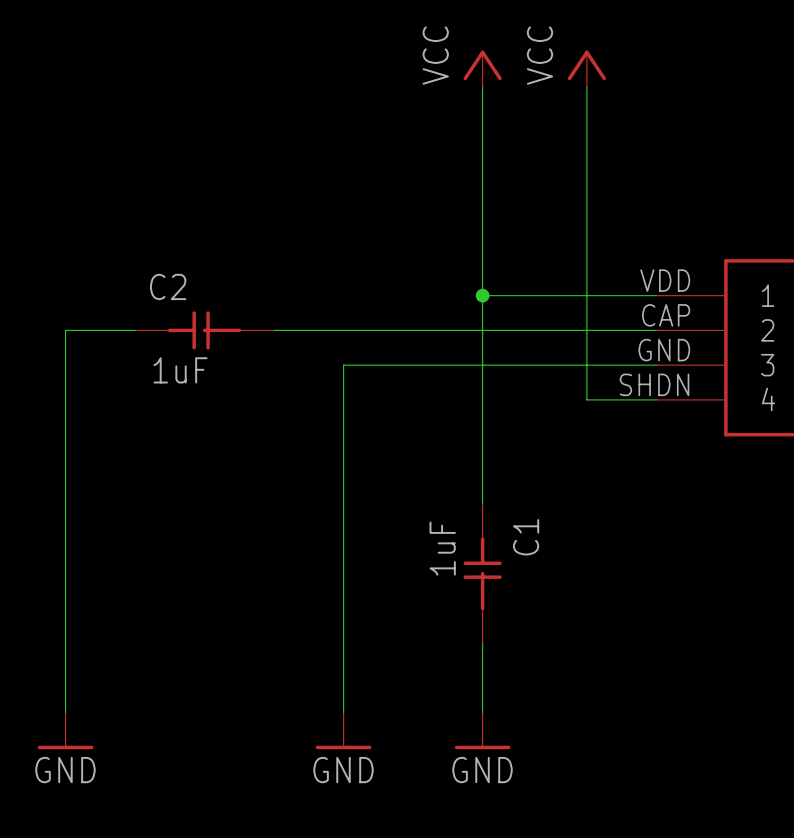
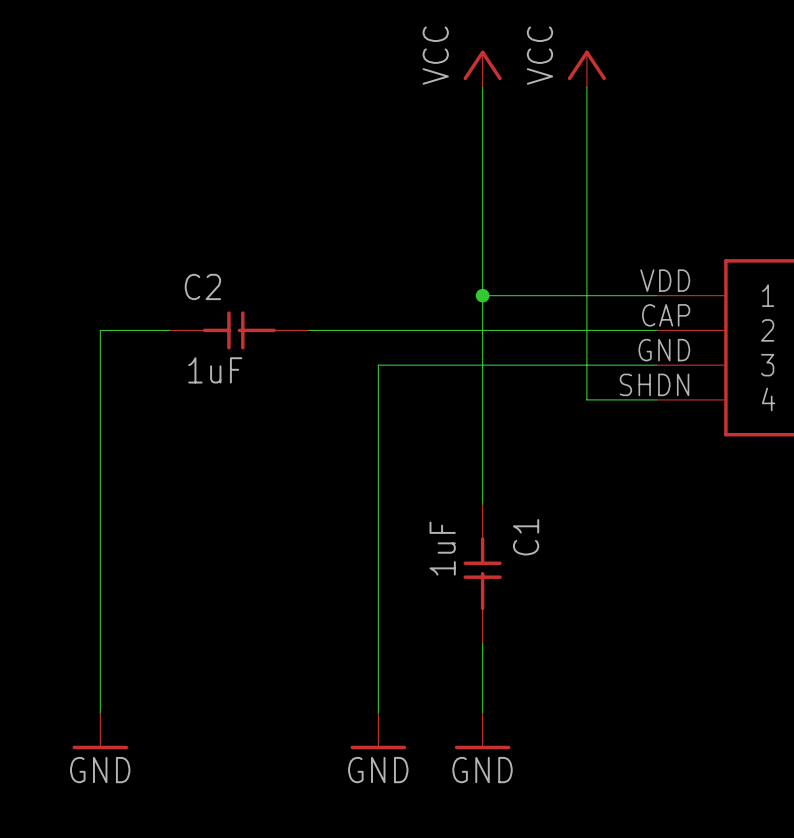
wire: (100, 330) (65, 330) (65, 712) -> (100, 330) (100, 712)
C2 position: (204, 330) -> (239, 330)
wire: (378, 365) (343, 365) (343, 712) -> (378, 365) (378, 712)
power symbol position: GND (65, 730) -> GND (100, 730)
power symbol position: GND (343, 730) -> GND (378, 730)

